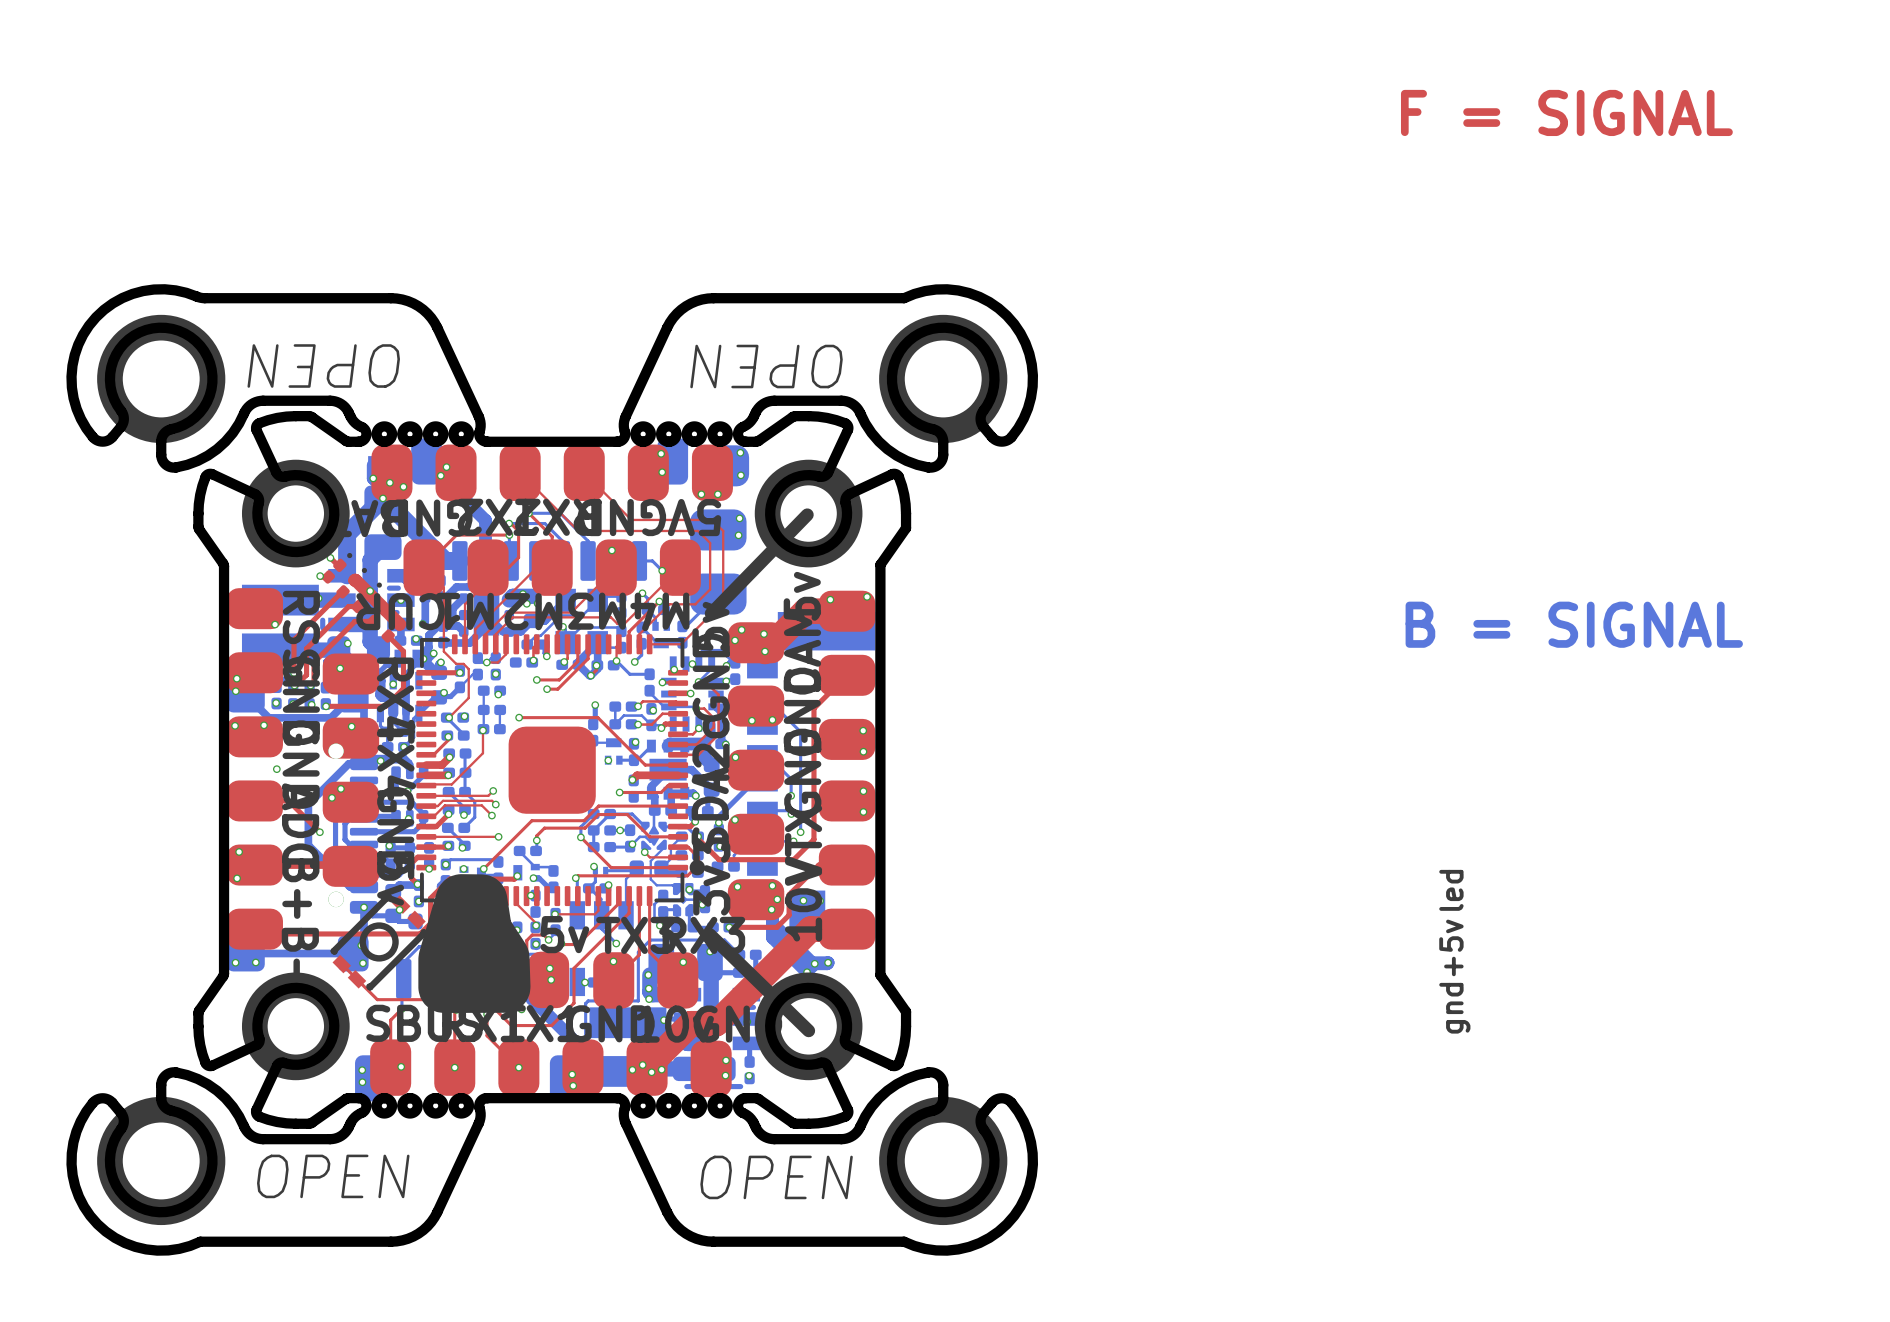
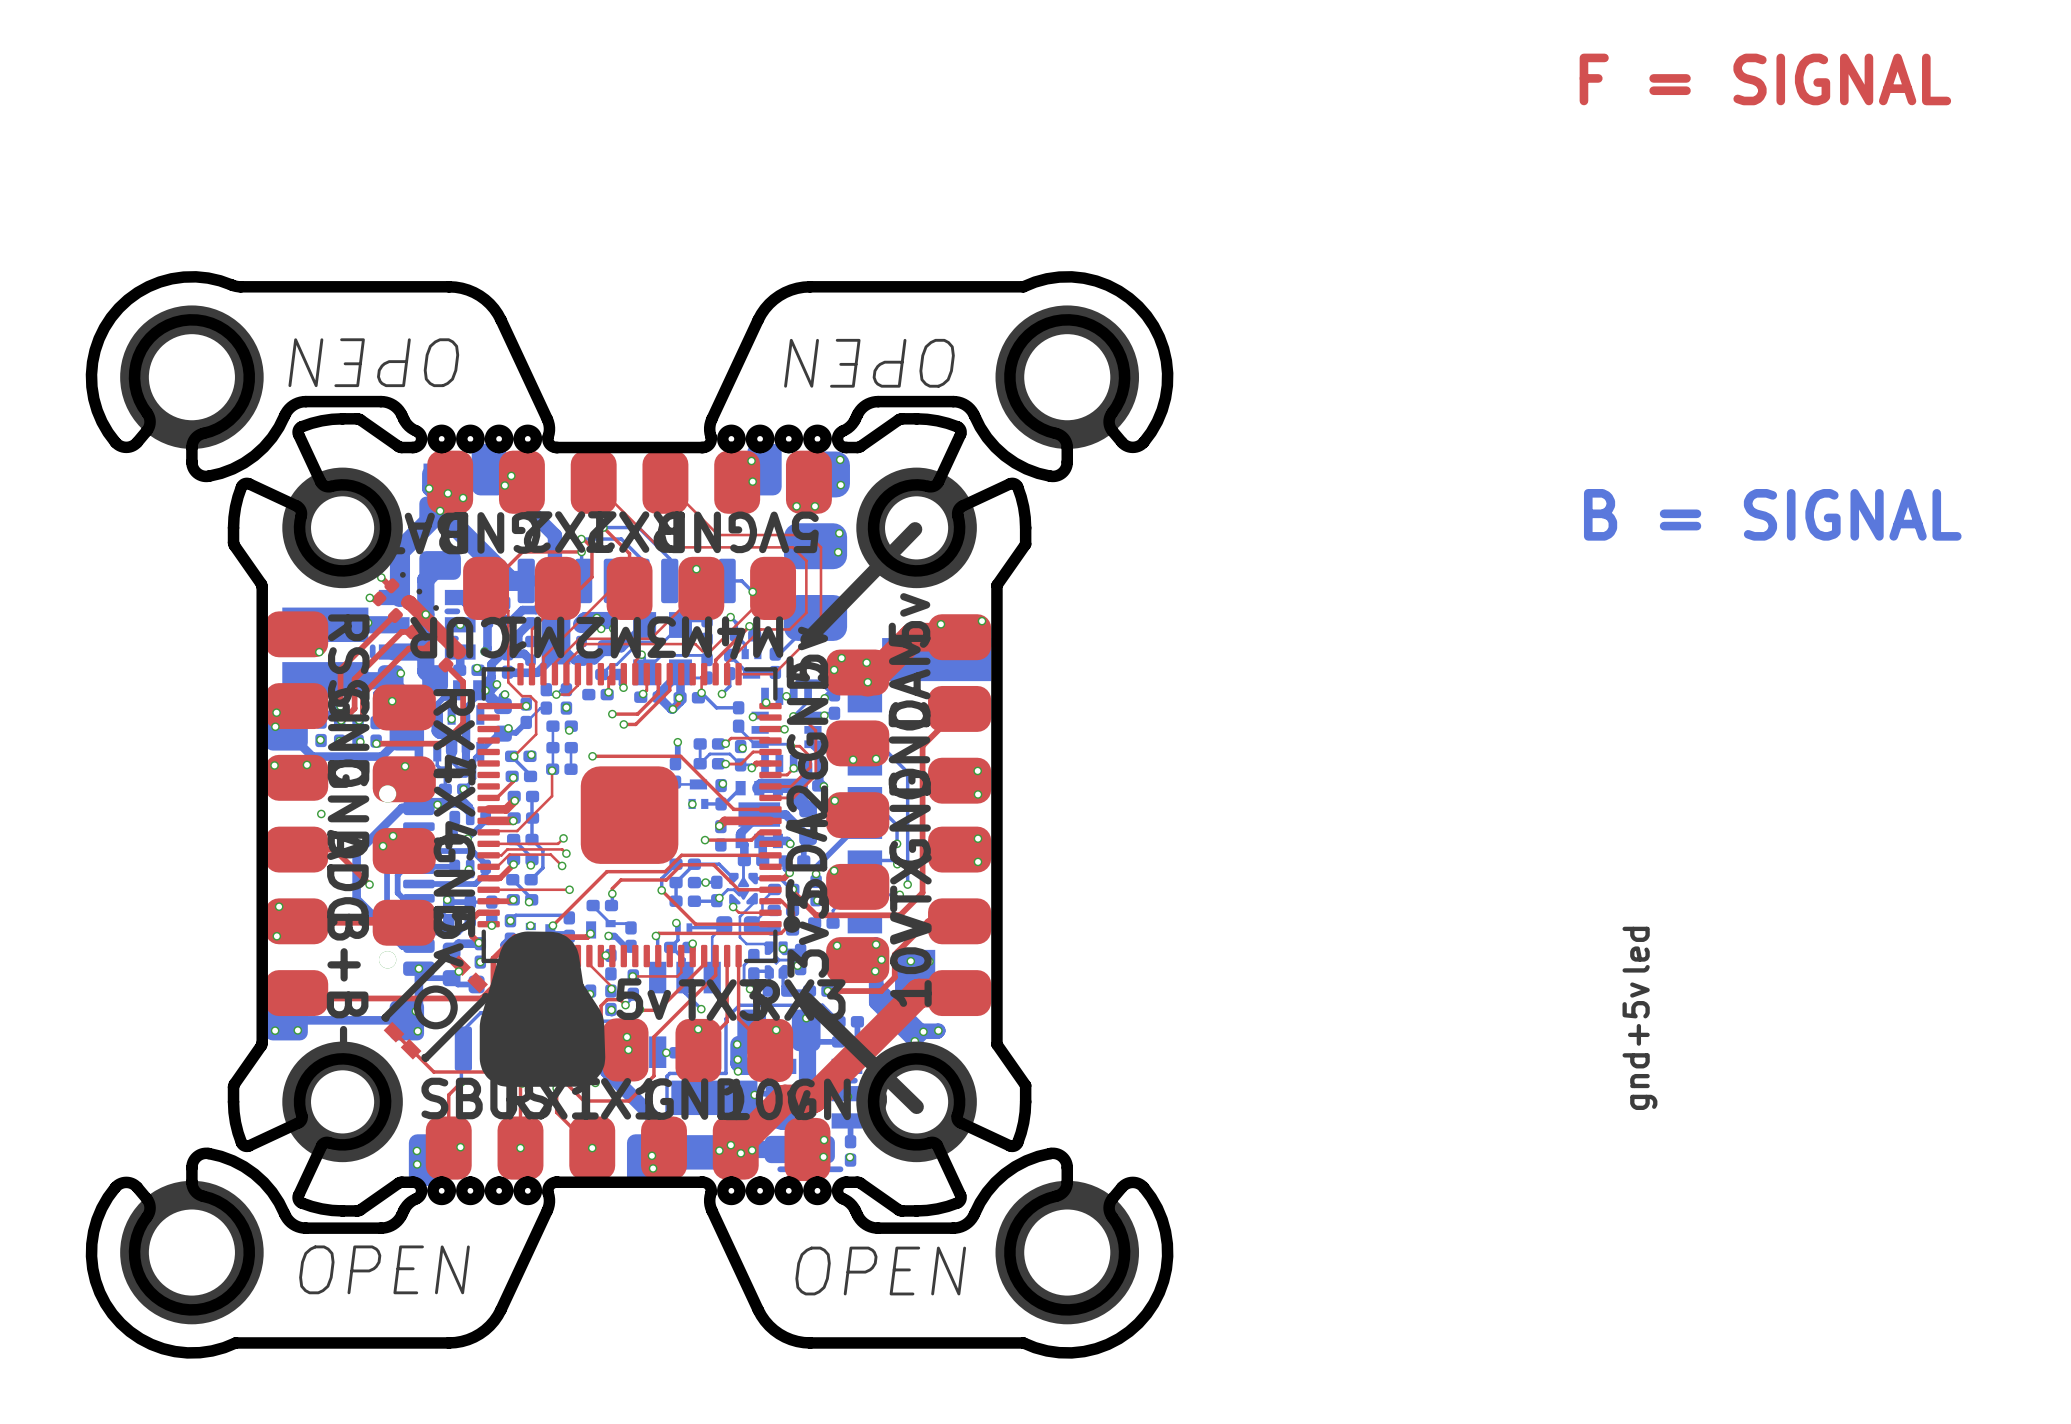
text position: B = SIGNAL (1574, 624) -> B = SIGNAL (1772, 514)

